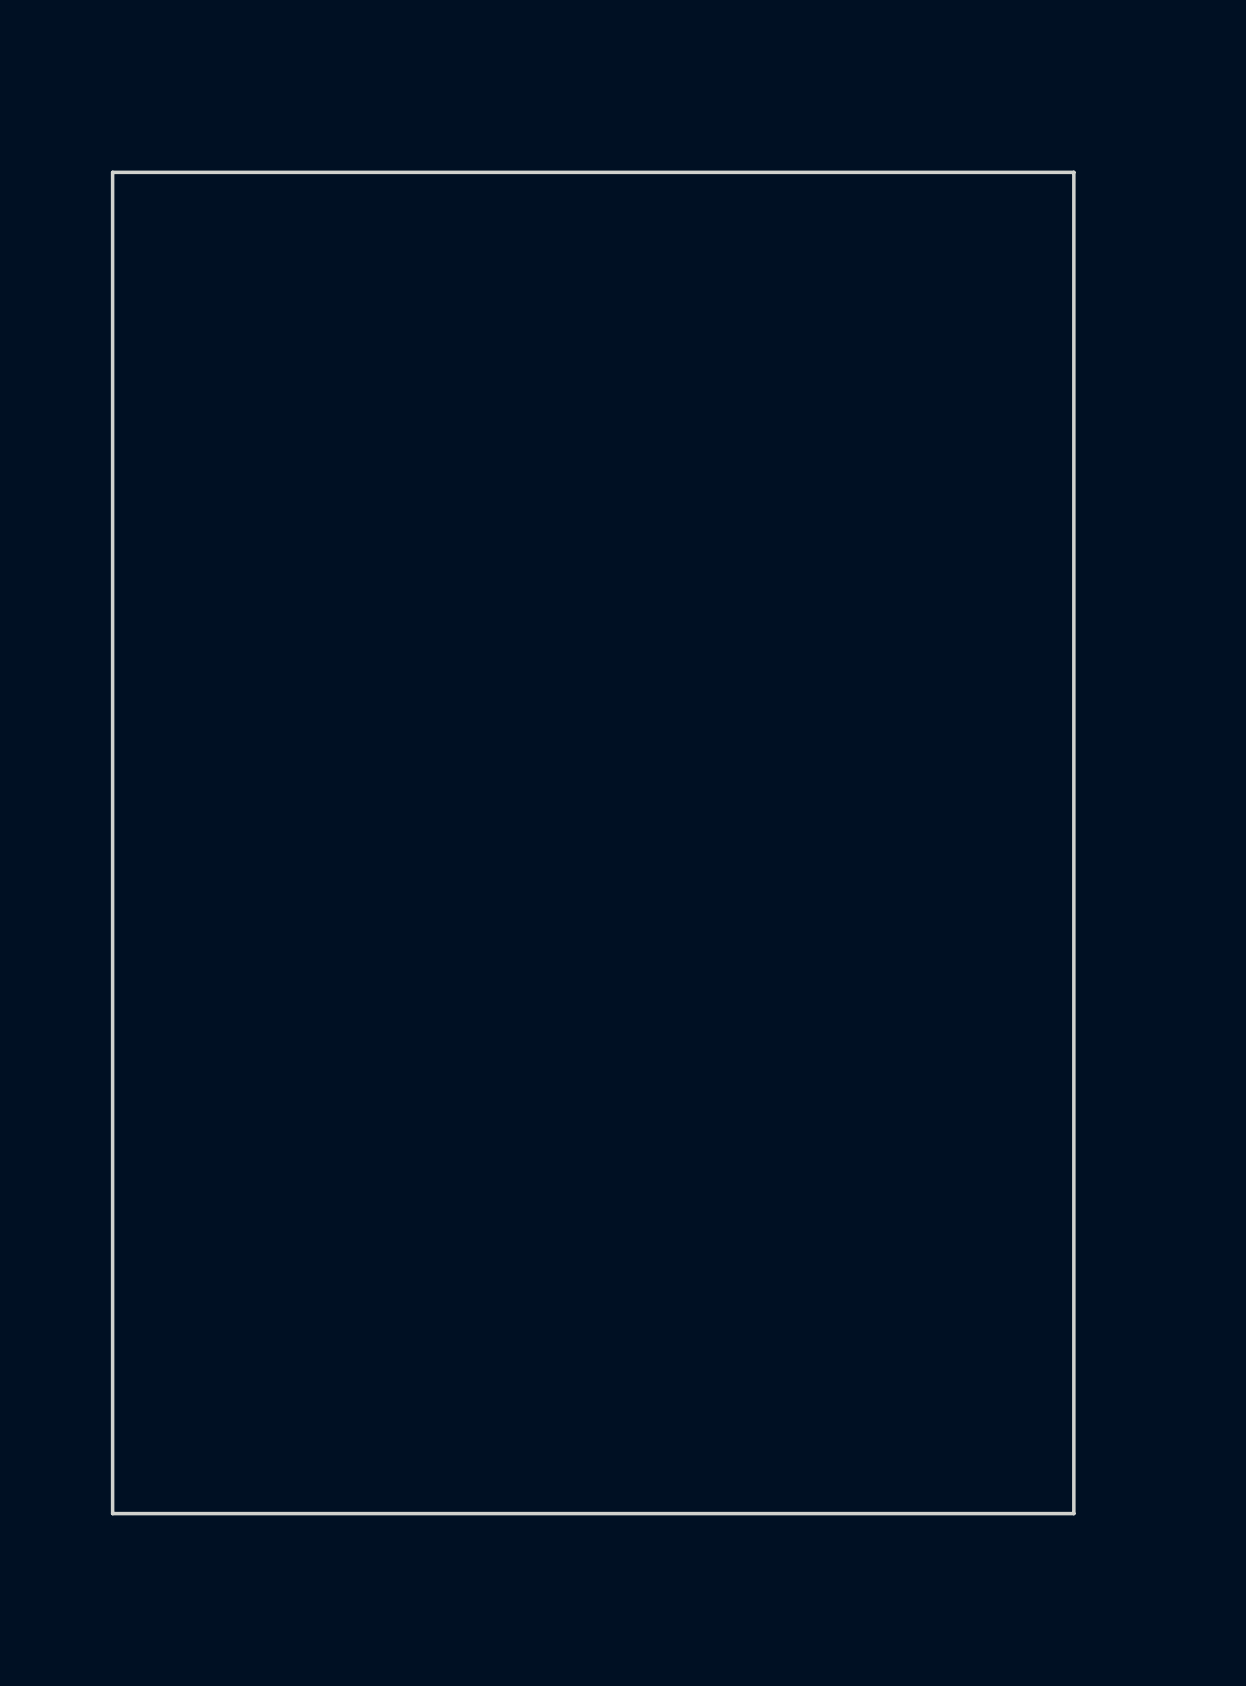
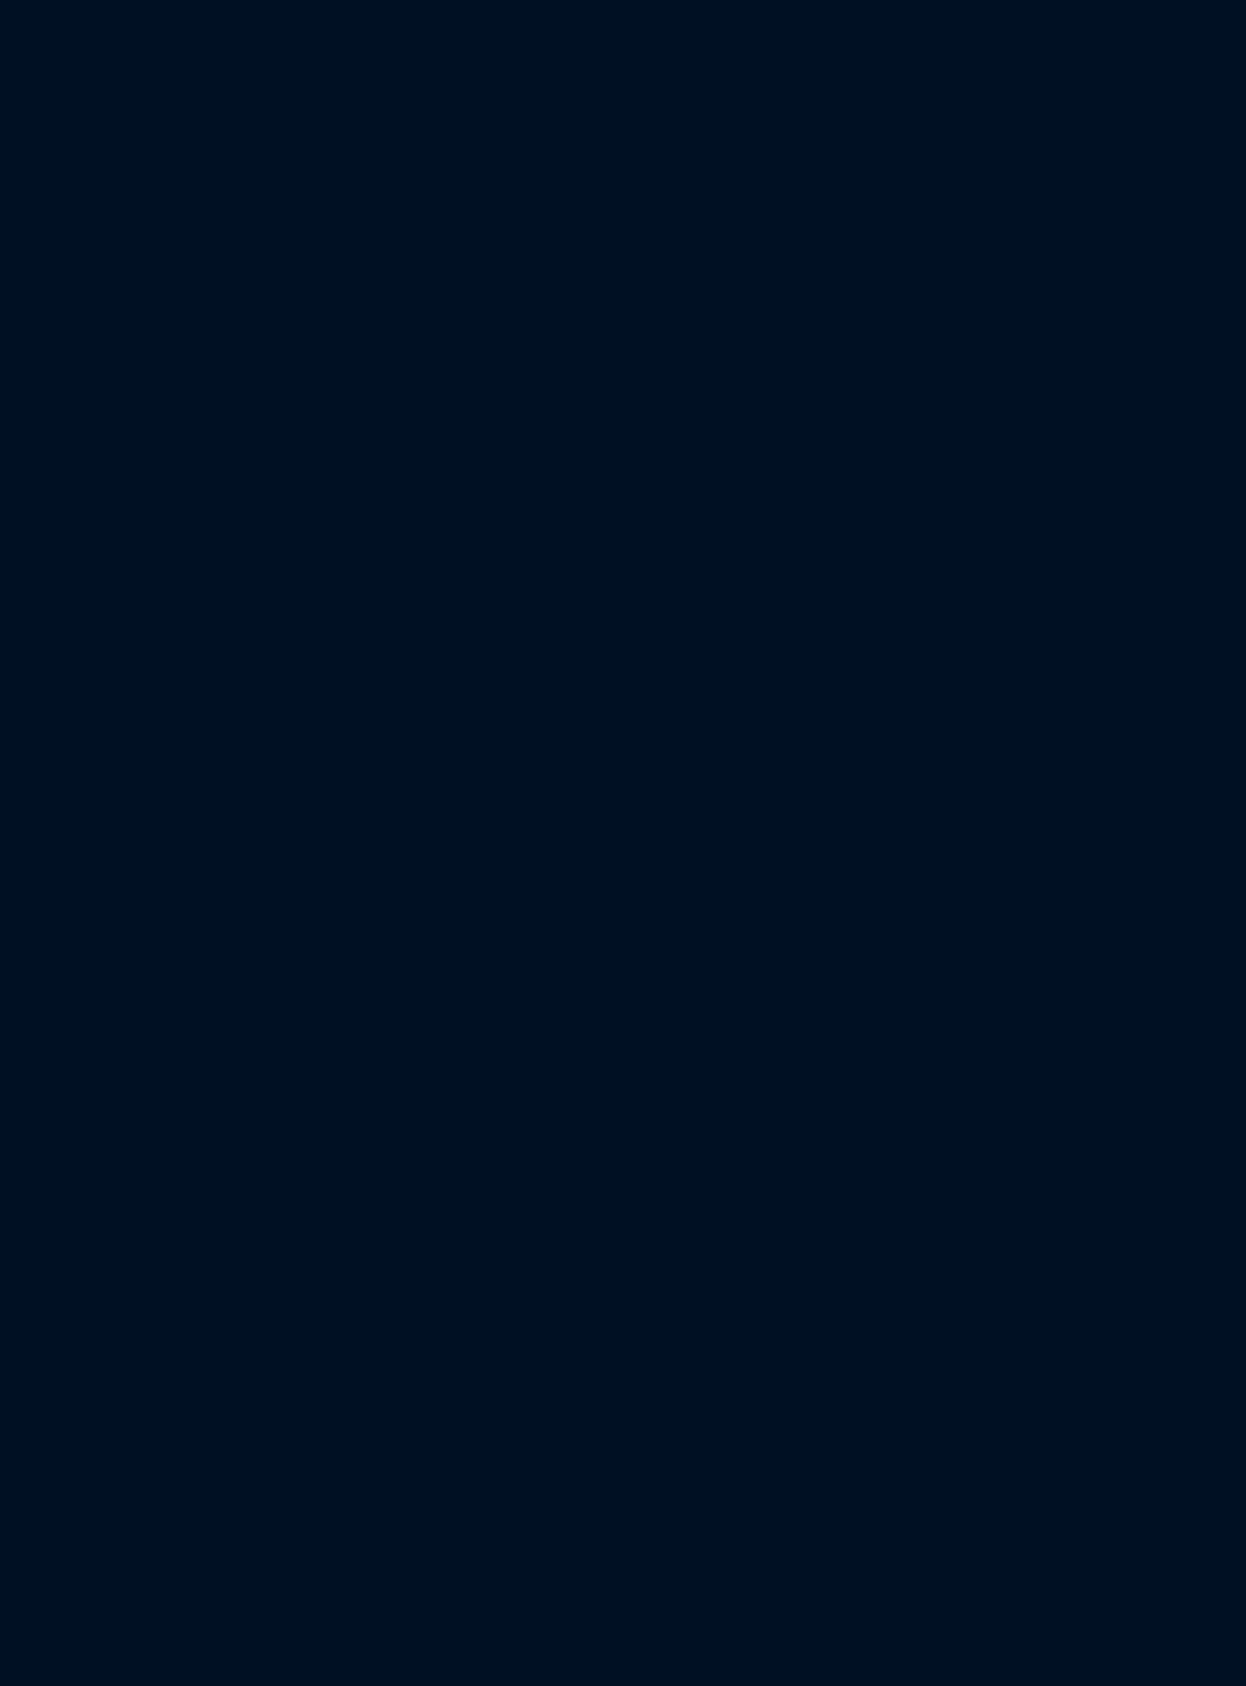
board edge: (1073, 172) (112, 172) (112, 1513) (1073, 1513) (1073, 172) -> none

